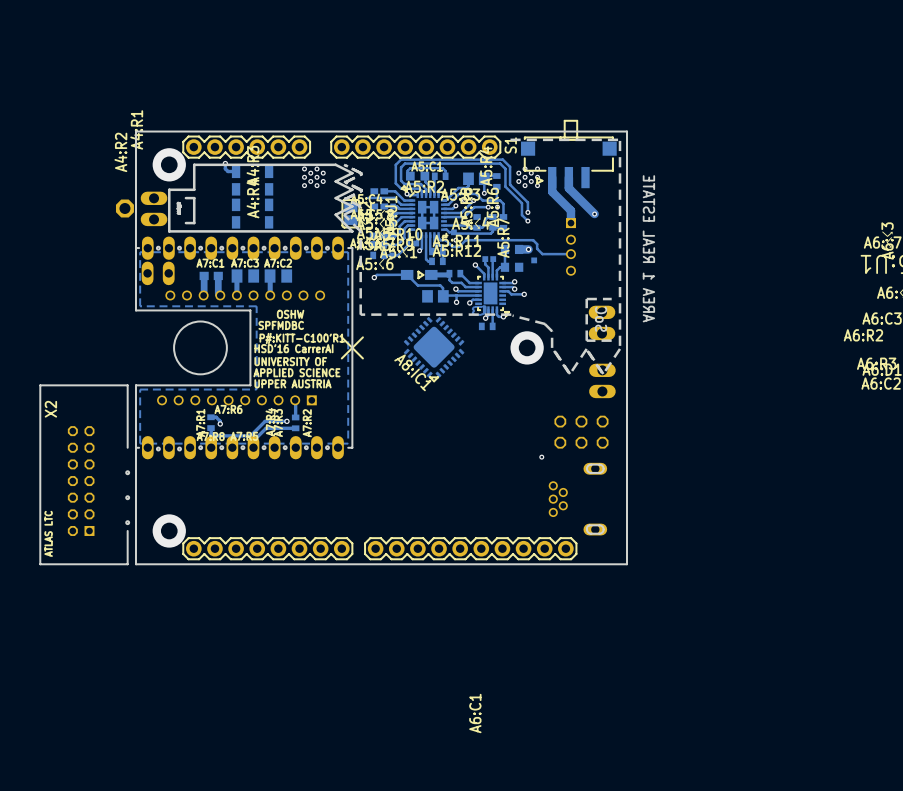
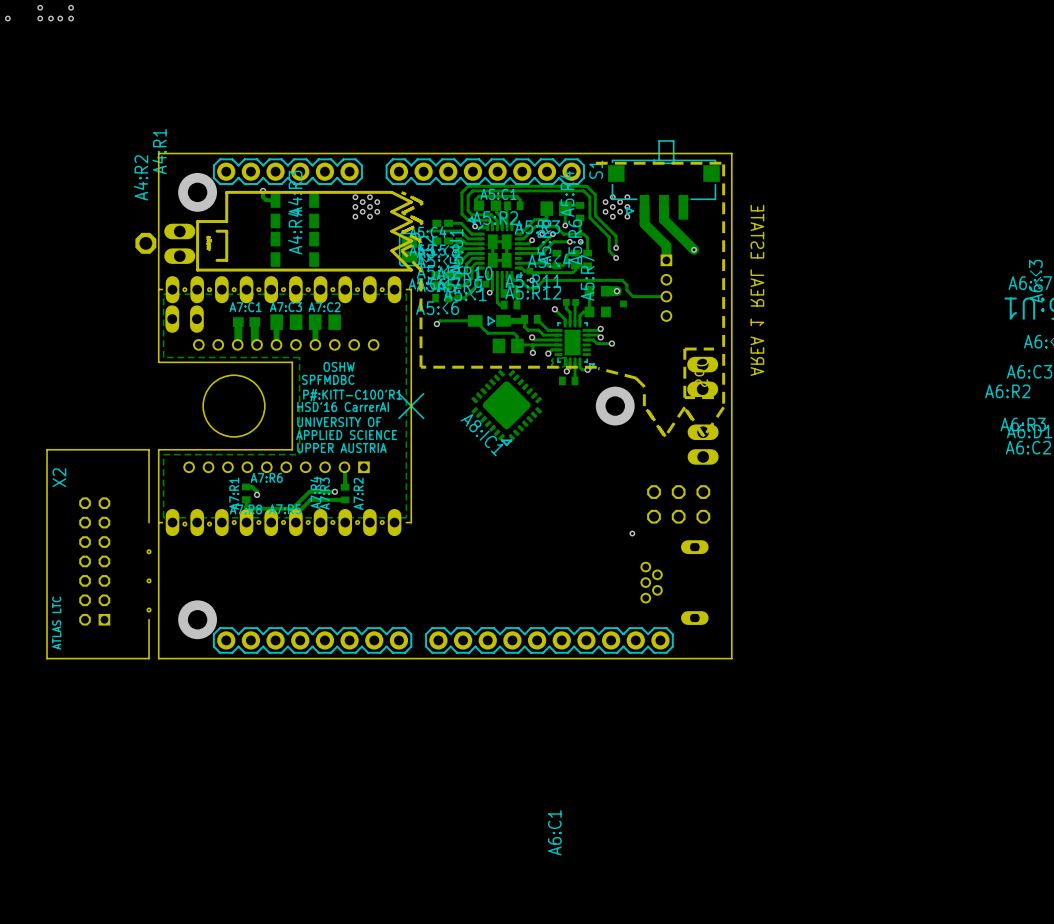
via: none -> (40, 7)
via: none -> (71, 7)
via: none -> (7, 18)
via: none -> (40, 18)
via: none -> (51, 18)
via: none -> (60, 18)
via: none -> (71, 18)

